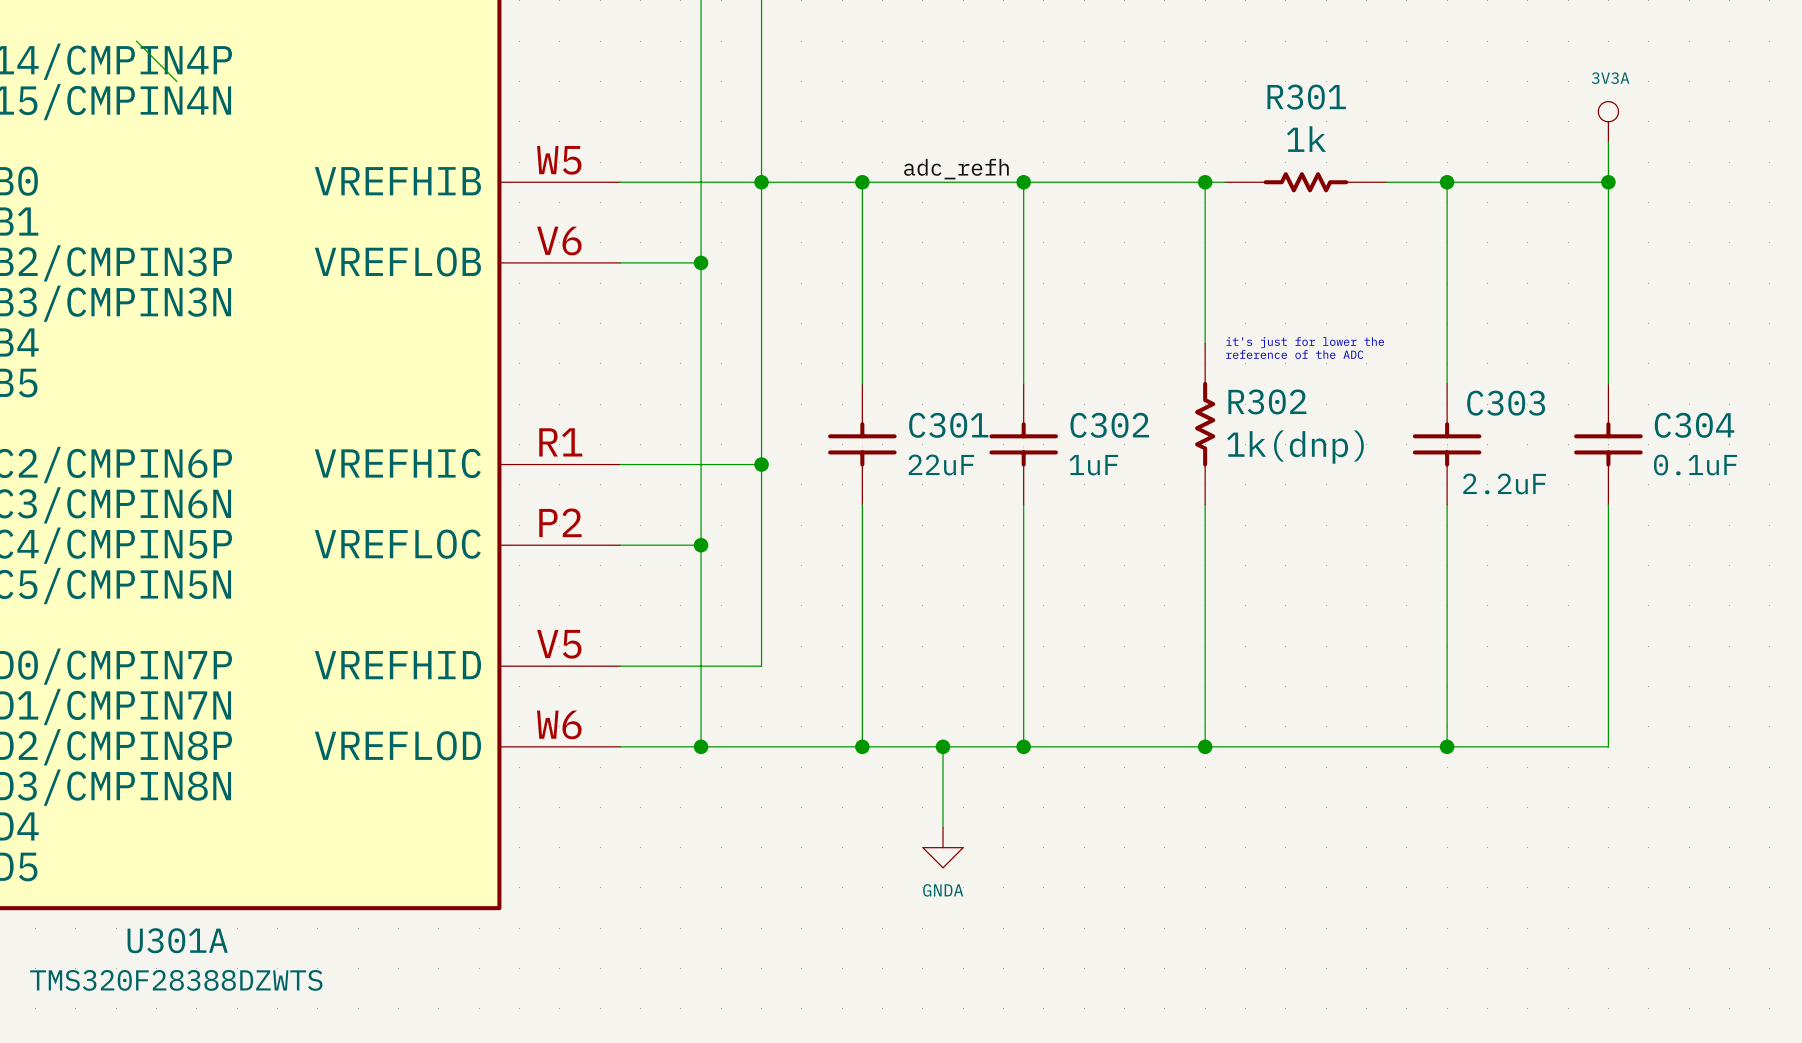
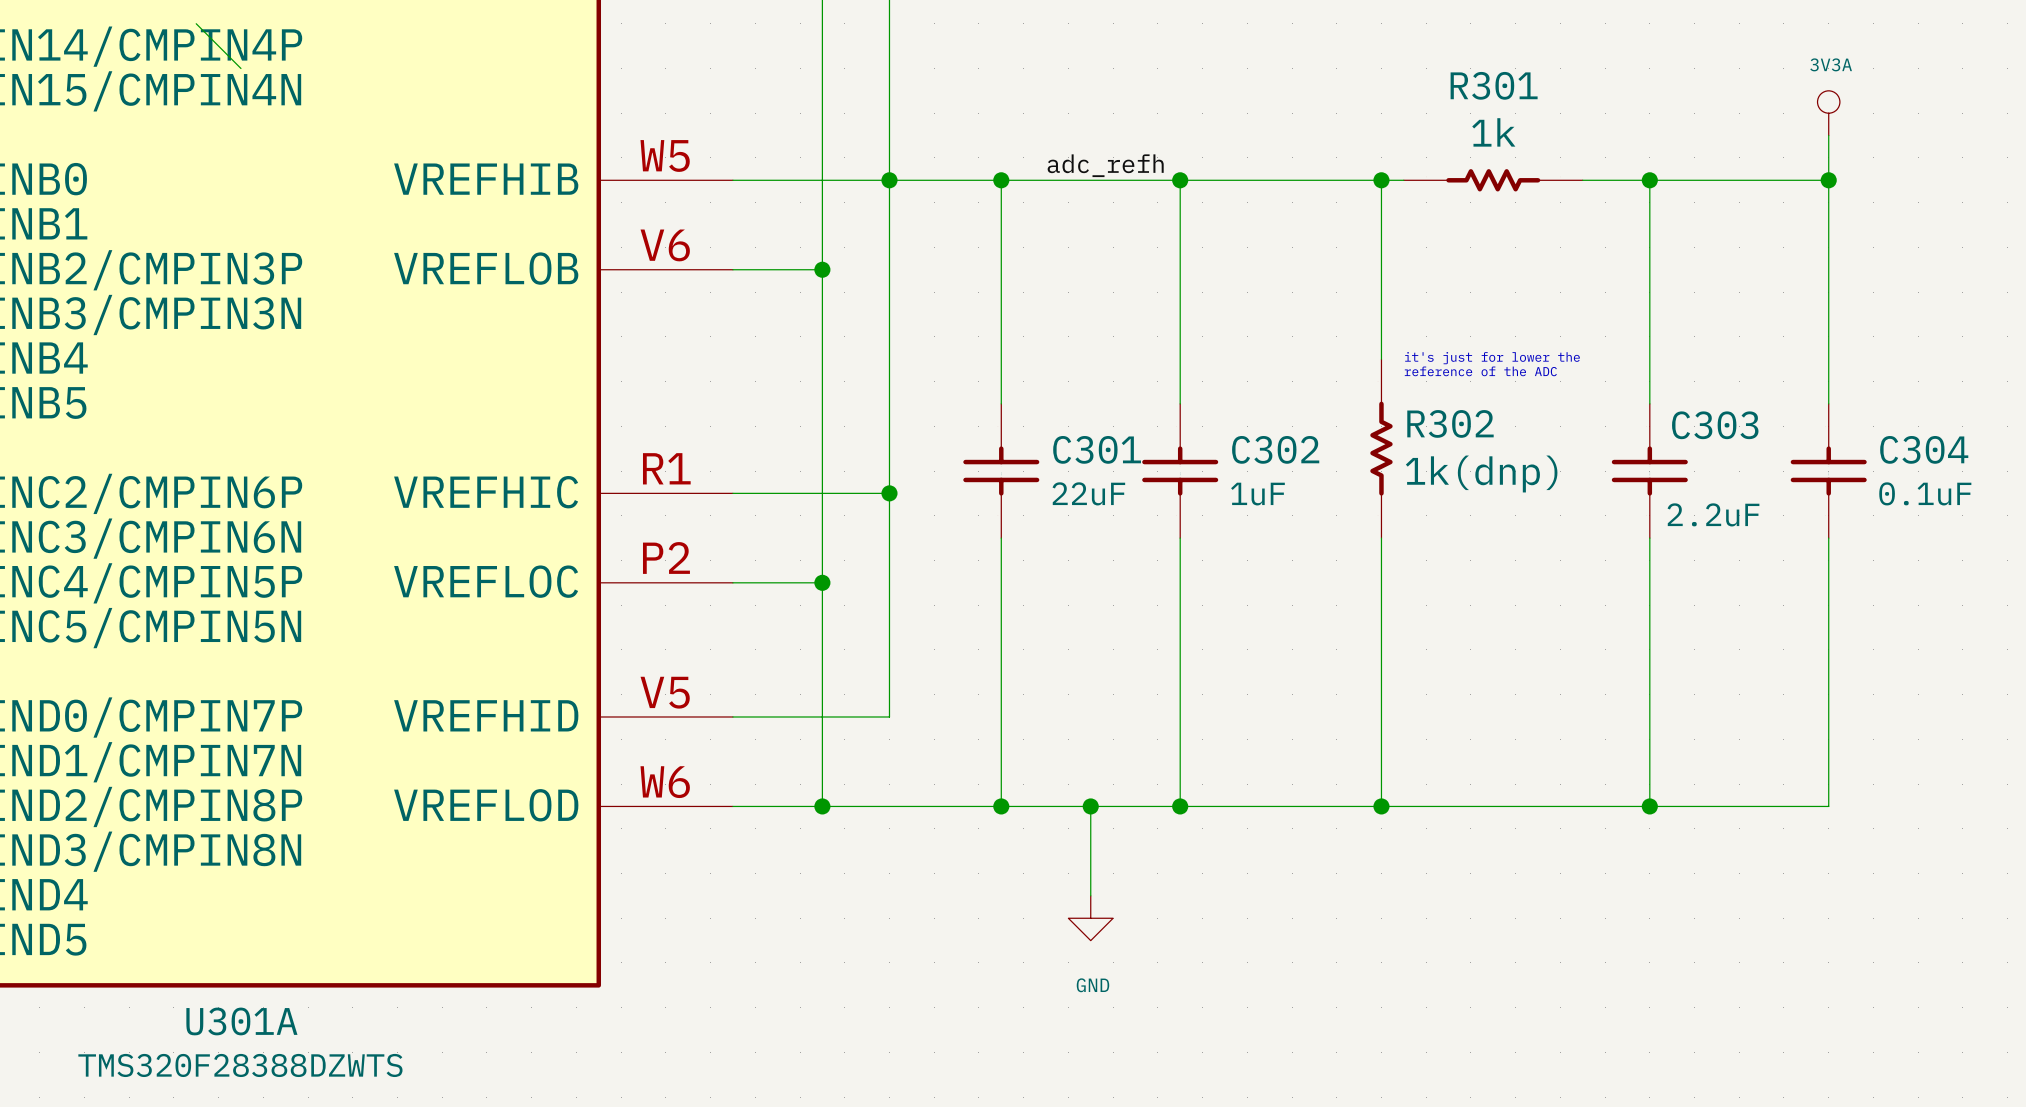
power symbol: GNDA (943, 847) -> GND (1090, 918)

